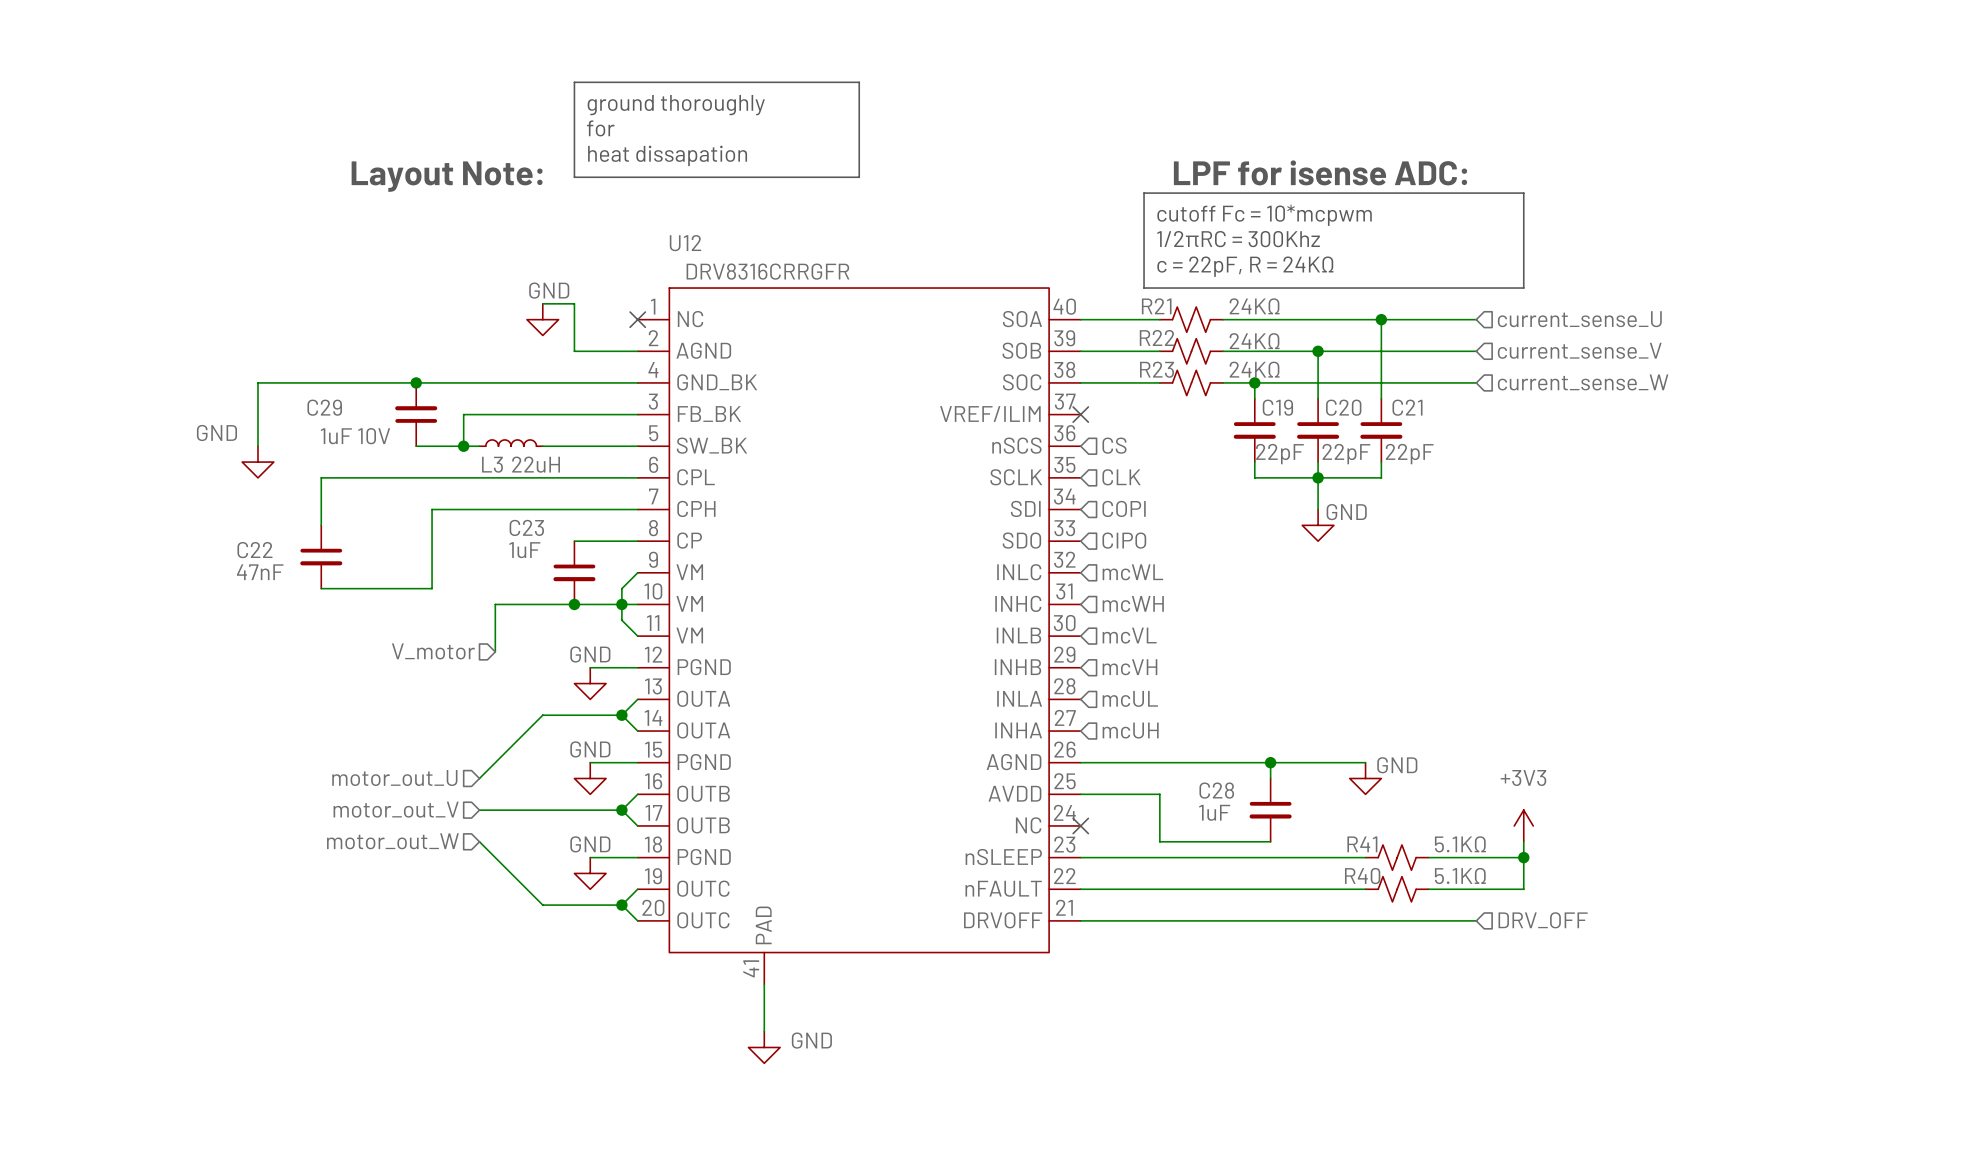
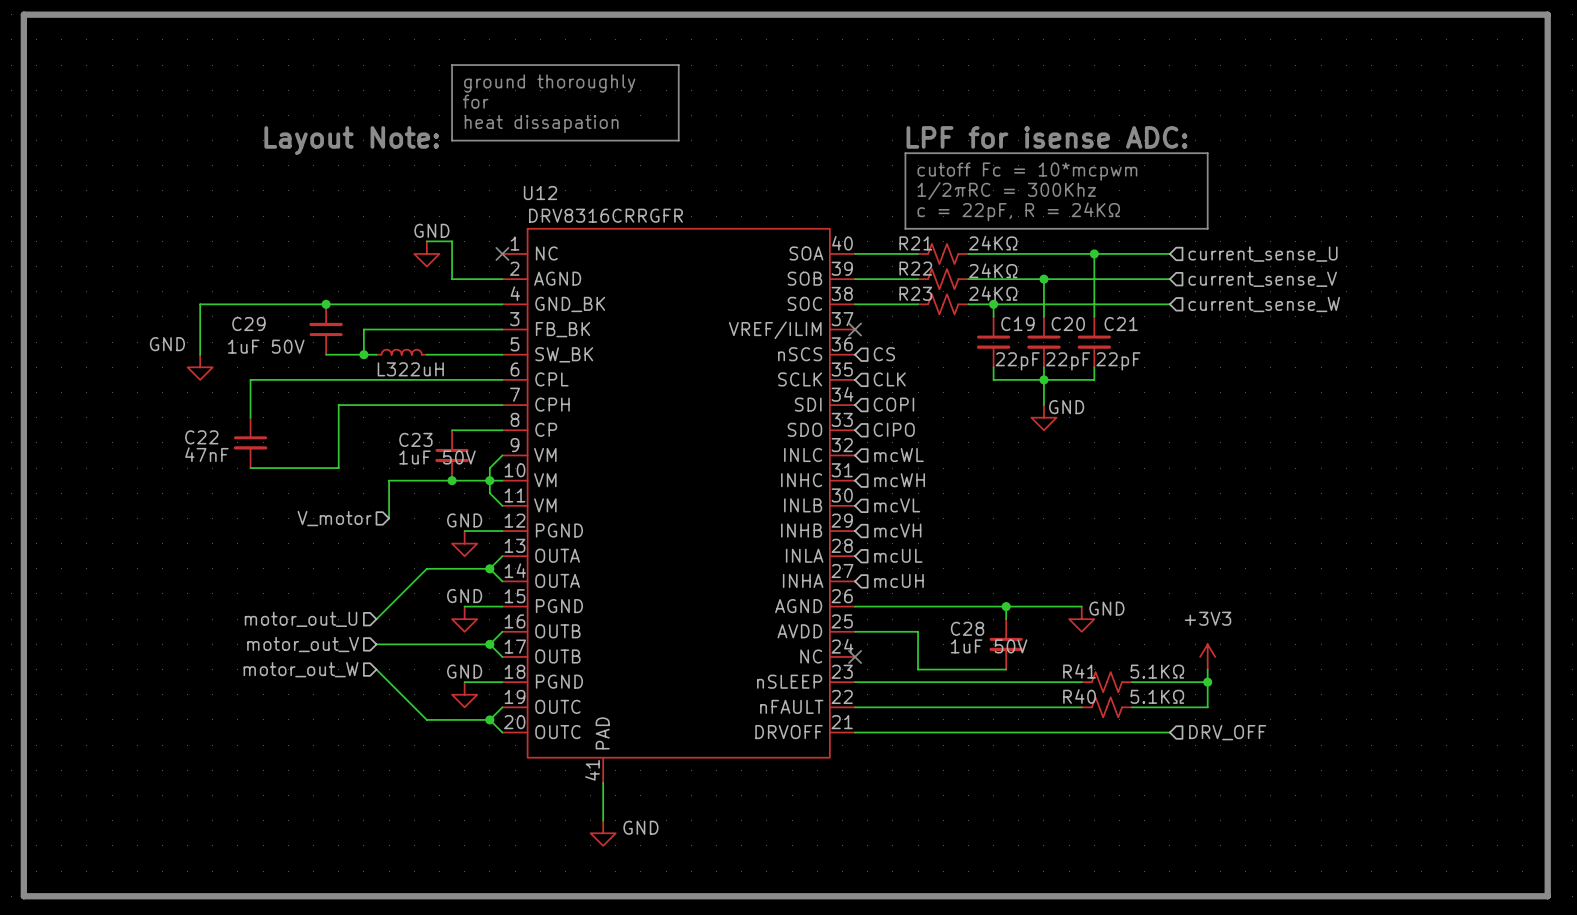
line: none -> (23, 14) (1547, 14) (1547, 896) (23, 896) (23, 14)
C29 value: 1uF 10V (355, 436) -> 1uF 50V (266, 346)
C21 value position: 22pF (1346, 454) -> 22pF (1118, 361)
C20 value position: 22pF (1409, 454) -> 22pF (1068, 361)
C23 name position: C23 (526, 527) -> C23 (415, 439)
C23 value: 1uF (524, 550) -> 1uF 50V (437, 457)
C28 value: 1uF (1214, 812) -> 1uF 50V (989, 646)

